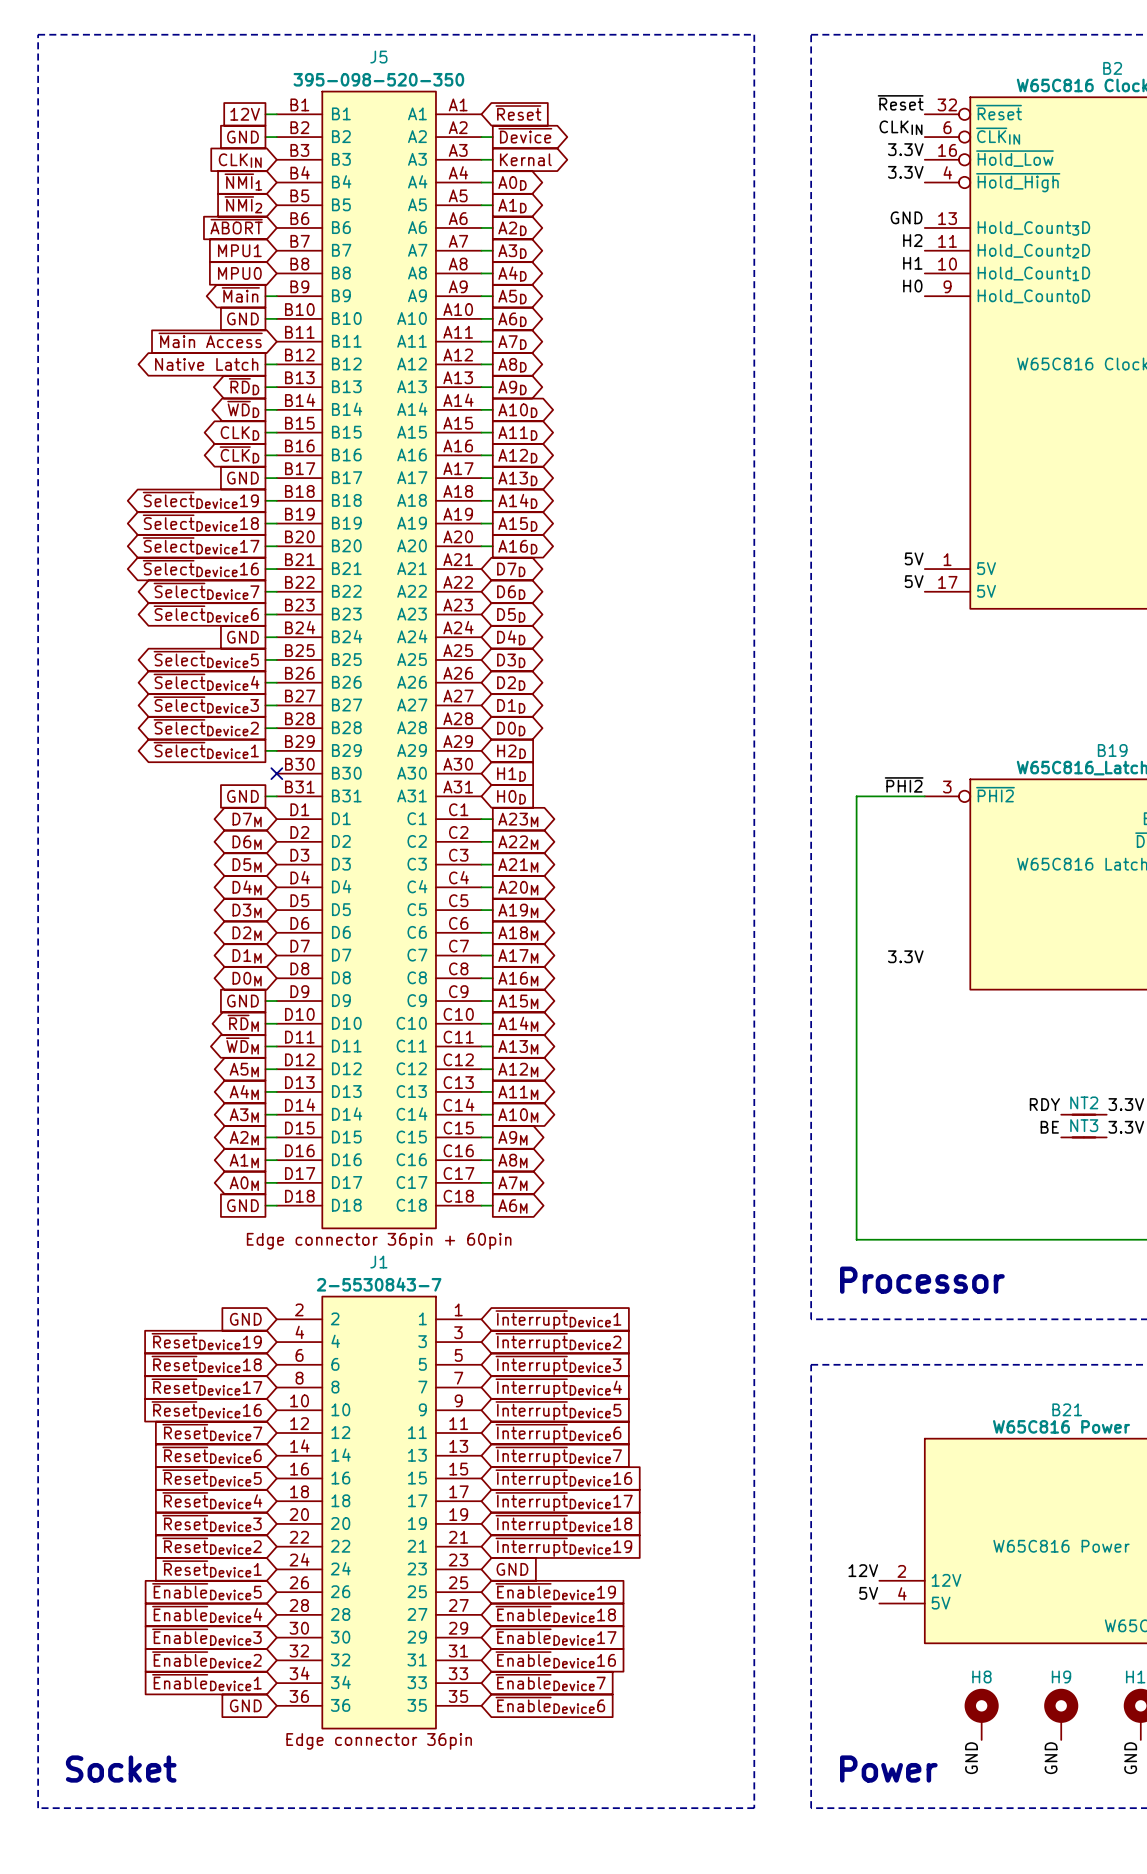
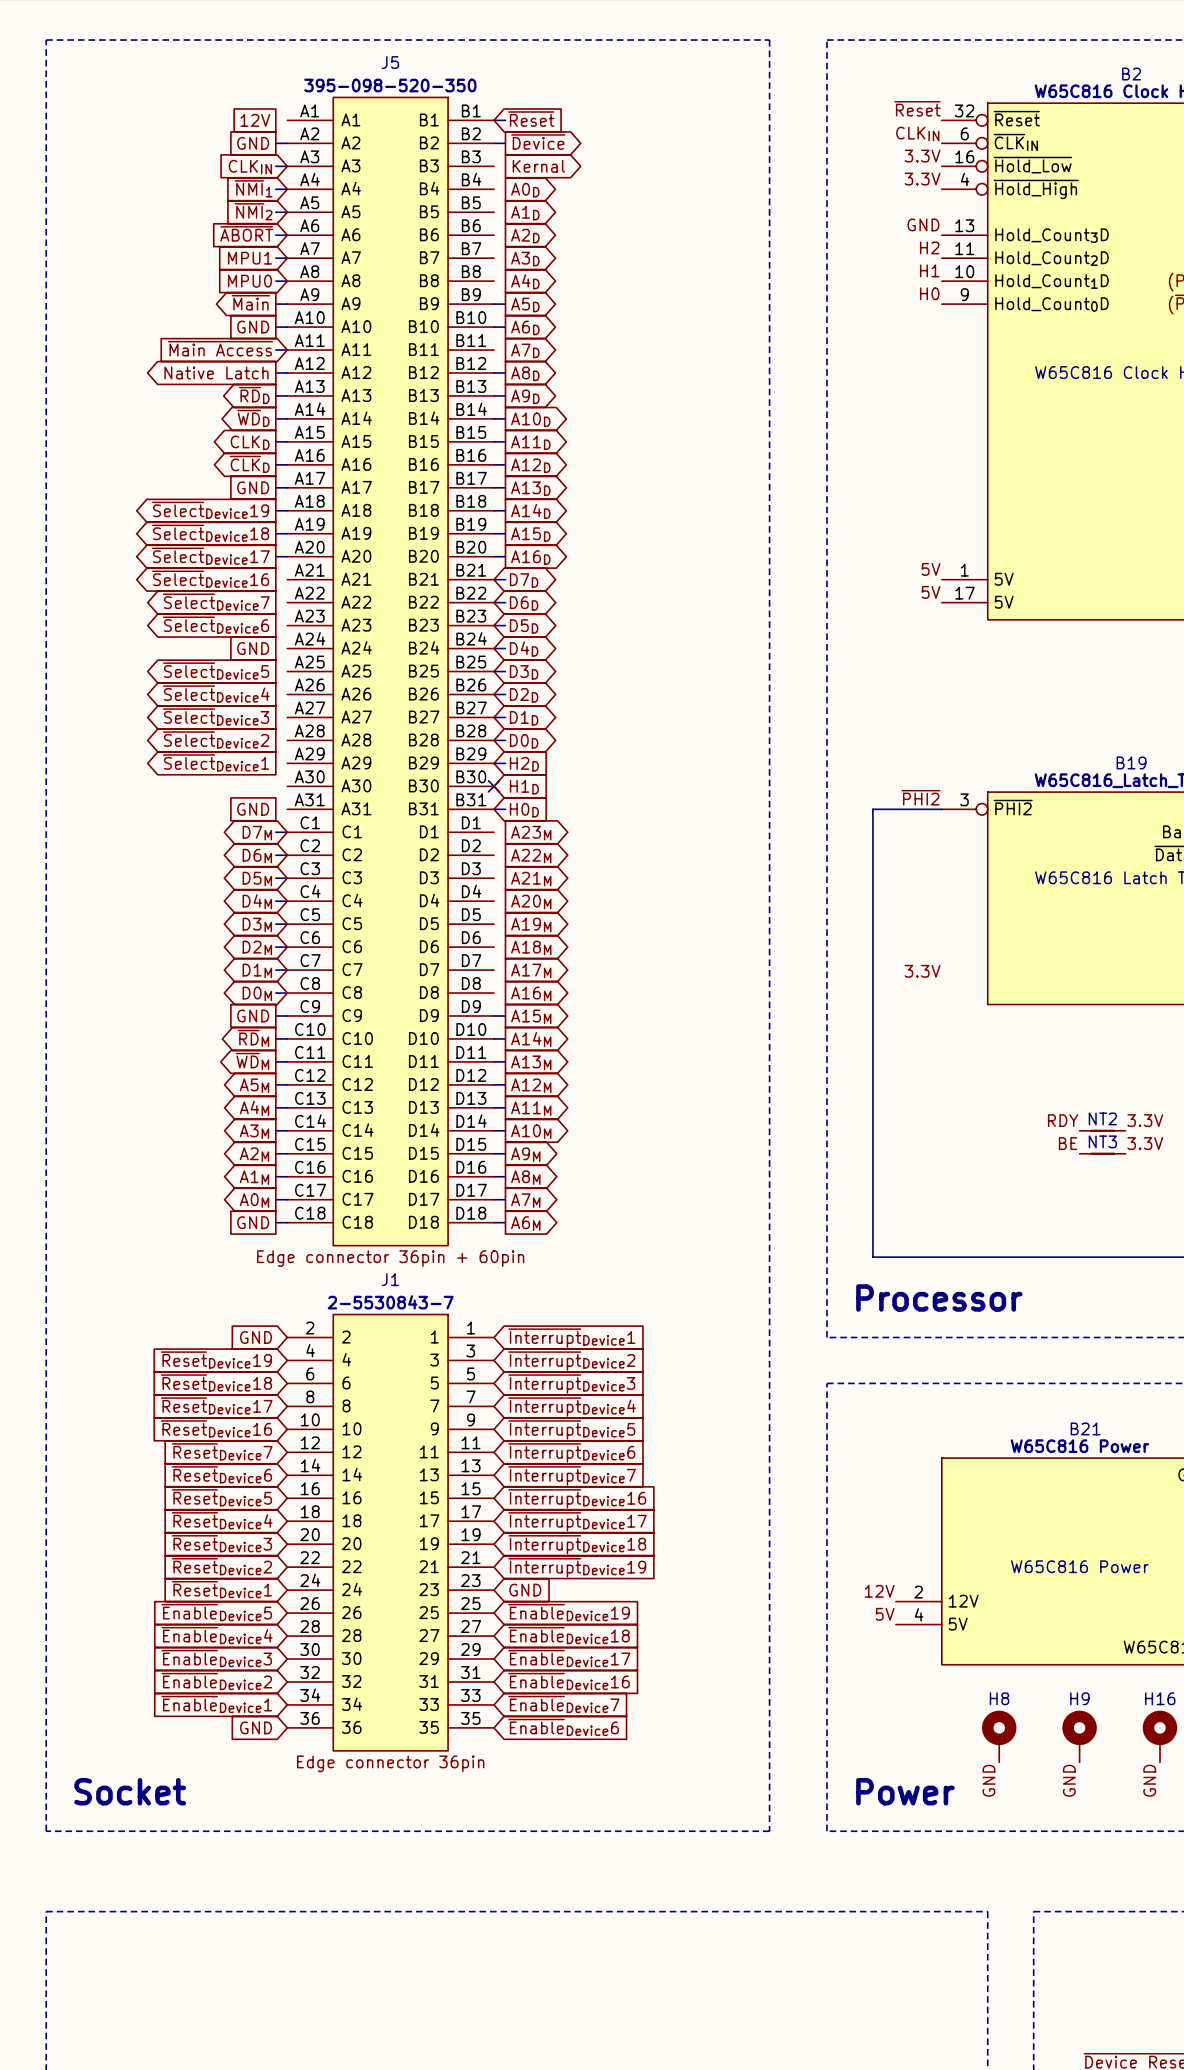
wire: (265, 114) (276, 114) -> (494, 120) (505, 120)
wire: (481, 159) (492, 159) -> (275, 166) (287, 166)
wire: (481, 182) (492, 182) -> (275, 189) (287, 189)
wire: (481, 205) (492, 205) -> (275, 212) (287, 212)
wire: (481, 227) (492, 227) -> (275, 235) (287, 235)
wire: (481, 250) (492, 250) -> (275, 258) (287, 258)
wire: (481, 273) (492, 273) -> (275, 281) (287, 281)
wire: (481, 341) (492, 341) -> (275, 350) (287, 350)
wire: (265, 569) (276, 569) -> (494, 579) (505, 579)
wire: (265, 591) (276, 591) -> (494, 602) (505, 602)
wire: (265, 614) (276, 614) -> (494, 625) (505, 625)
wire: (265, 637) (276, 637) -> (494, 648) (505, 648)
wire: (265, 659) (276, 659) -> (494, 671) (505, 671)
J5 flip: as is (379, 659) -> left-right (390, 671)
wire: (265, 682) (276, 682) -> (494, 694) (505, 694)
wire: (265, 705) (276, 705) -> (494, 717) (505, 717)
wire: (265, 728) (276, 728) -> (494, 740) (505, 740)
wire: (265, 750) (276, 750) -> (494, 763) (505, 763)
no-connect mark: (276, 773) -> none
no-connect mark: none -> (494, 786)
wire: (265, 796) (276, 796) -> (494, 809) (505, 809)
wire: (481, 819) (492, 819) -> (275, 832) (287, 832)
wire: (481, 841) (492, 841) -> (275, 855) (287, 855)
wire: (481, 864) (492, 864) -> (275, 878) (287, 878)
wire: (481, 887) (492, 887) -> (275, 901) (287, 901)
wire: (481, 910) (492, 910) -> (275, 924) (287, 924)
wire: (481, 932) (492, 932) -> (275, 947) (287, 947)
wire: (481, 955) (492, 955) -> (275, 970) (287, 970)
wire: (481, 978) (492, 978) -> (275, 993) (287, 993)

